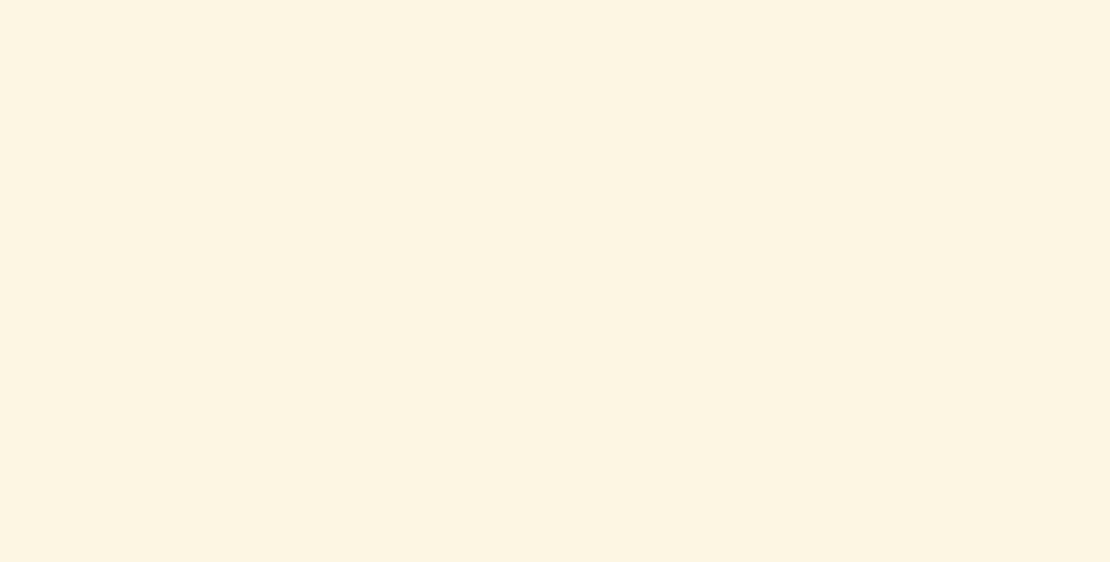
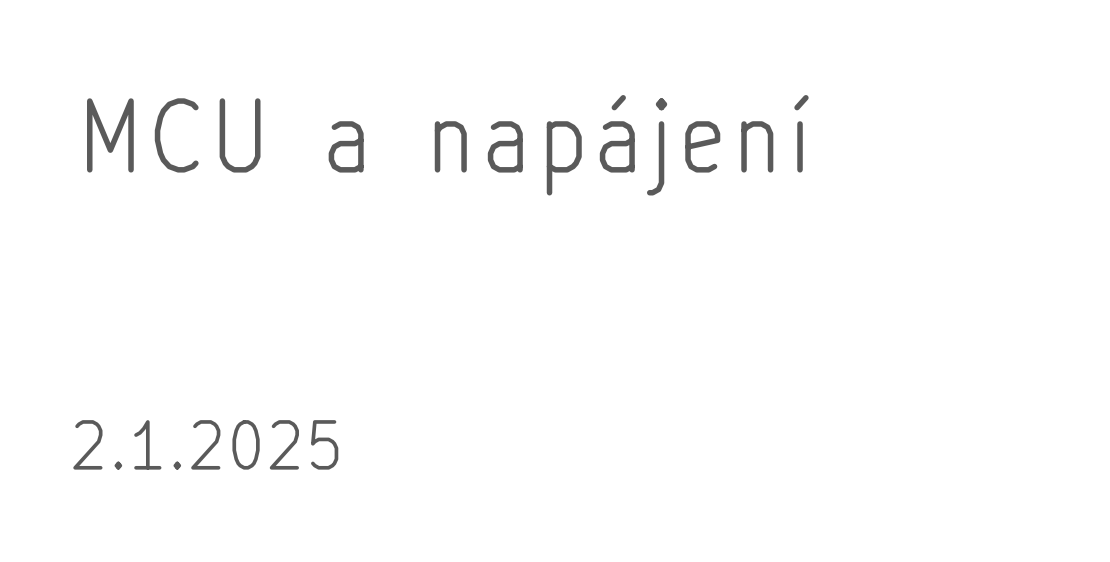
text: none -> MCU a napájení (447, 145)
text: none -> 2.1.2025 (205, 444)

